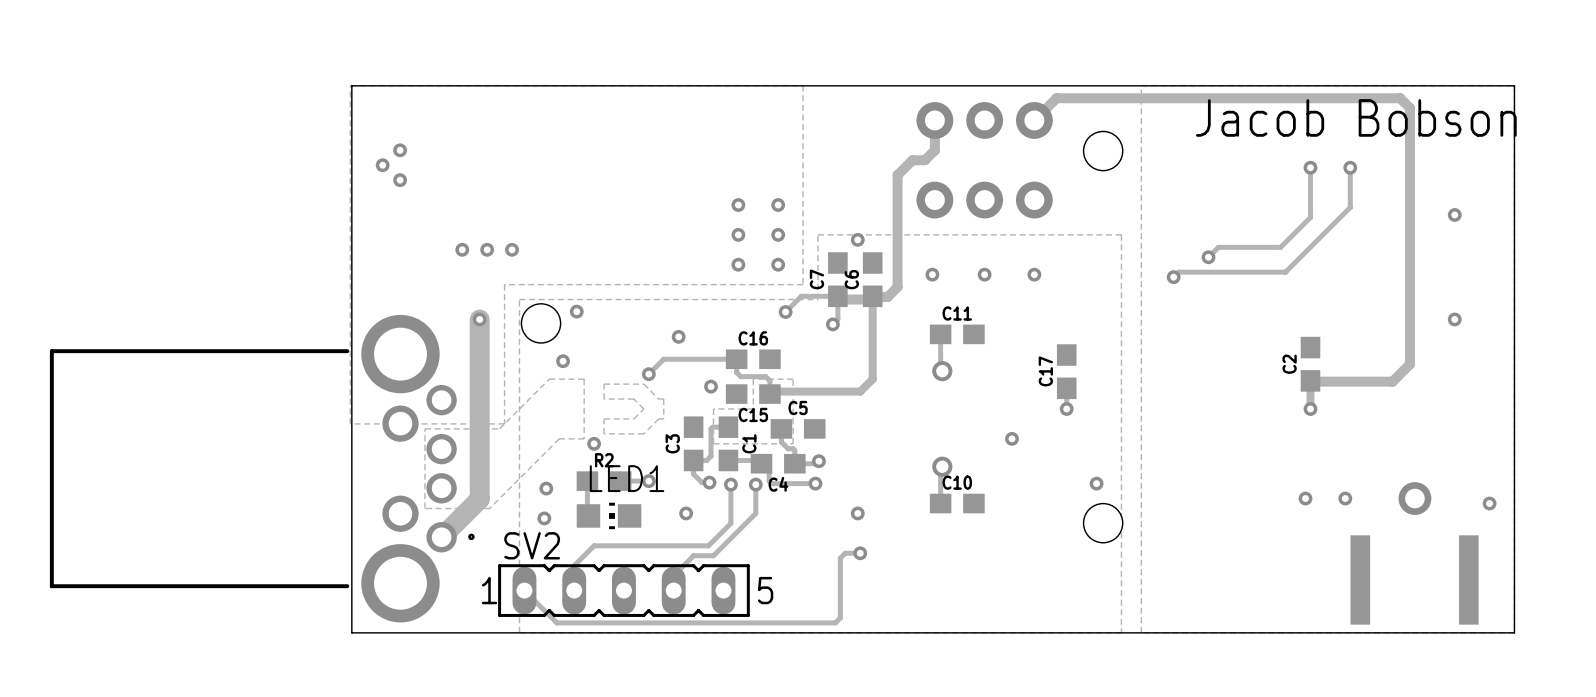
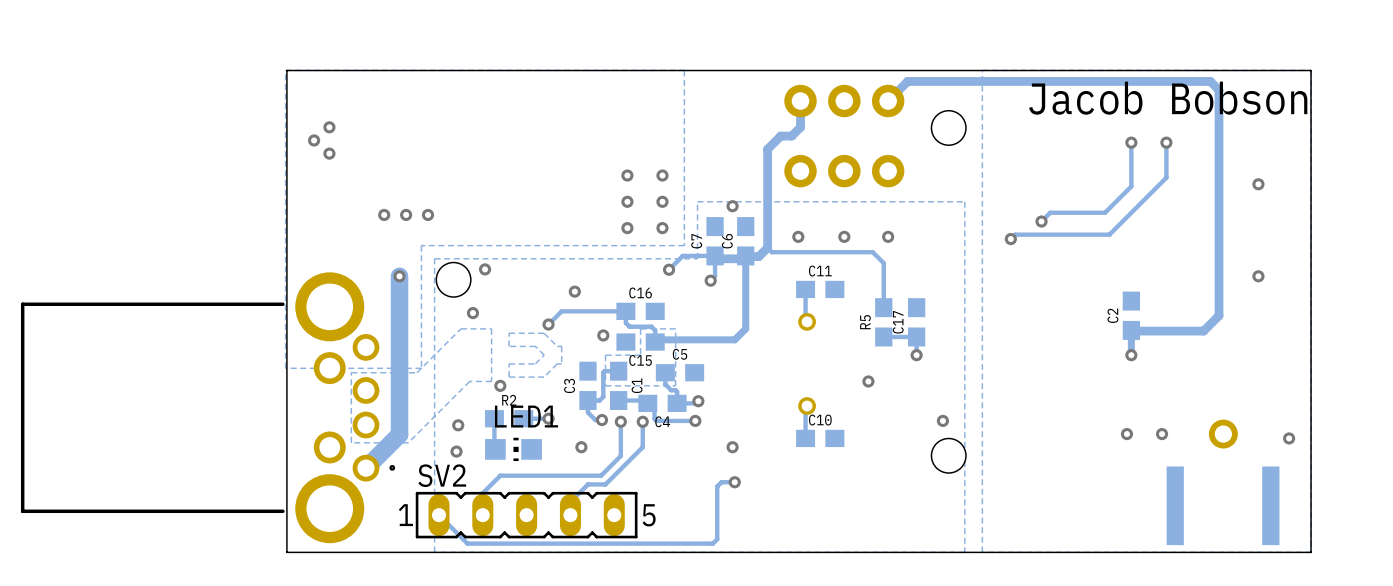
track: none -> (767, 247) (772, 252) (872, 252) (883, 263) (883, 307)
R5: none -> (883, 322)
track: none -> (916, 336) (883, 336)

